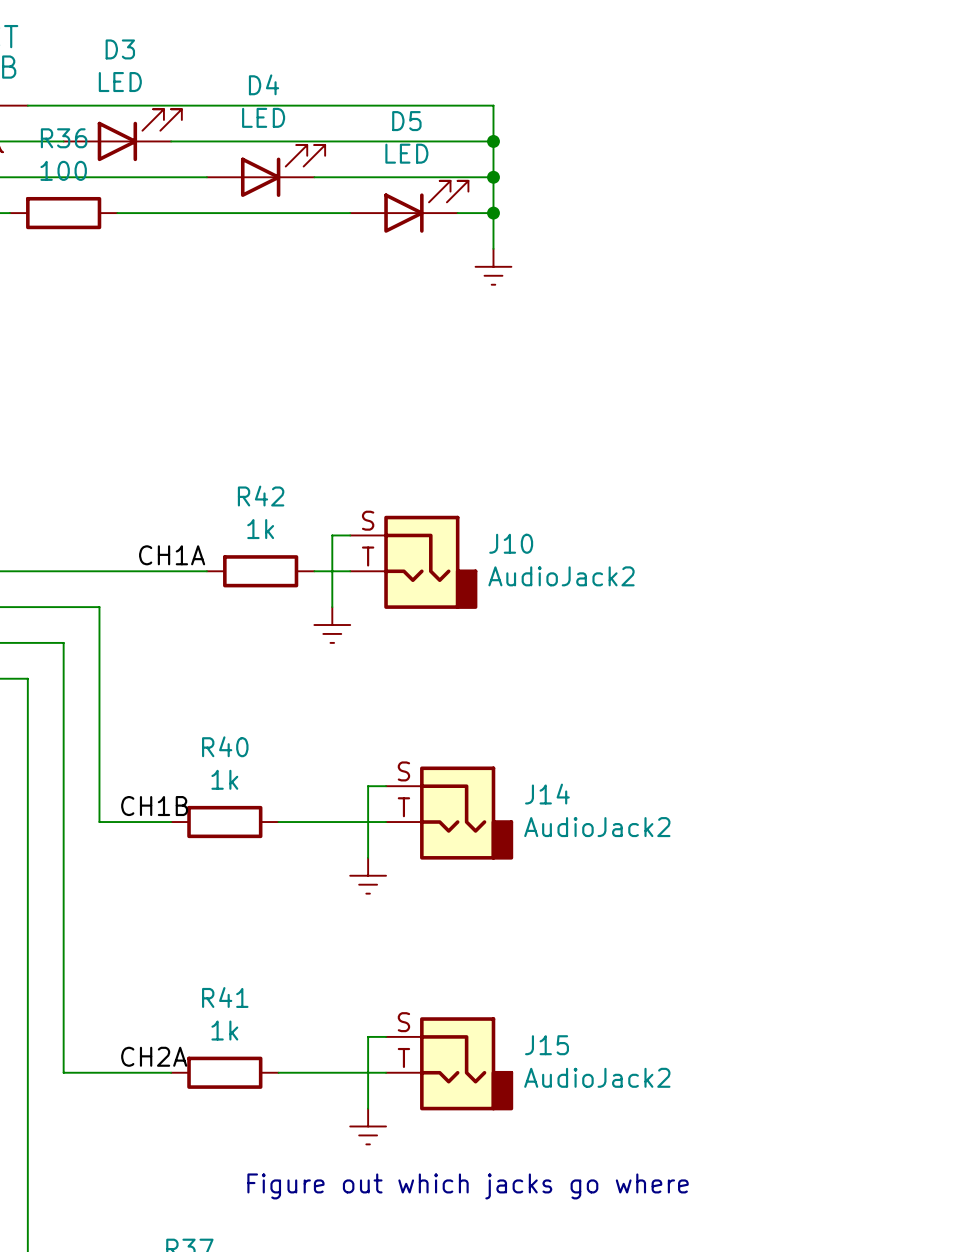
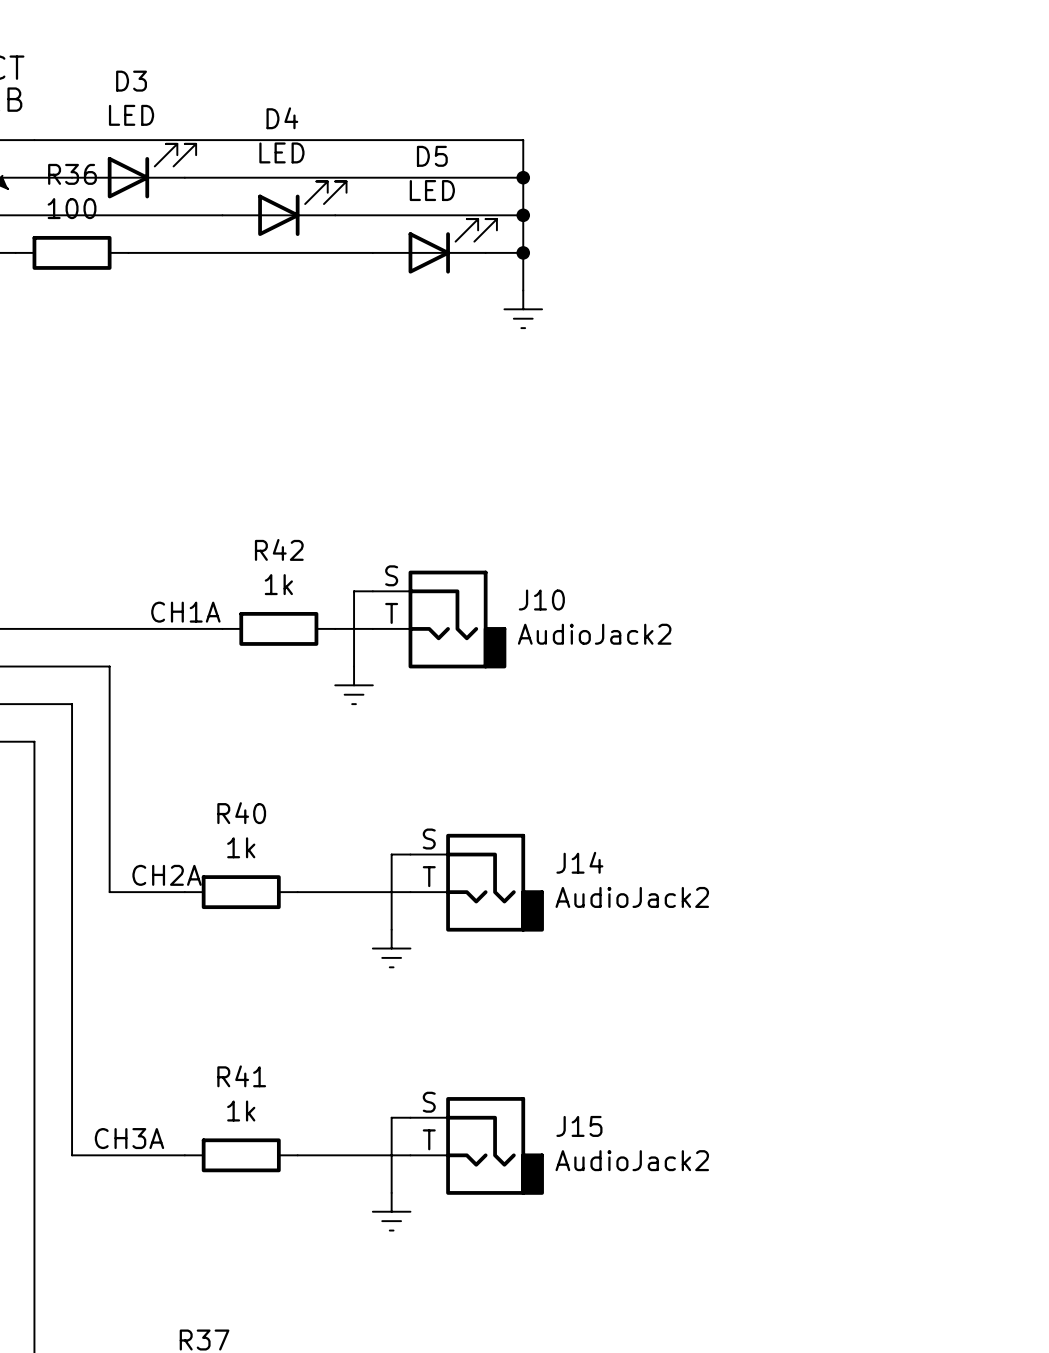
label: CH1B (154, 806) -> CH2A (167, 875)
label: CH2A (154, 1056) -> CH3A (129, 1138)
text: Figure out which jacks go where (468, 1186) -> none

